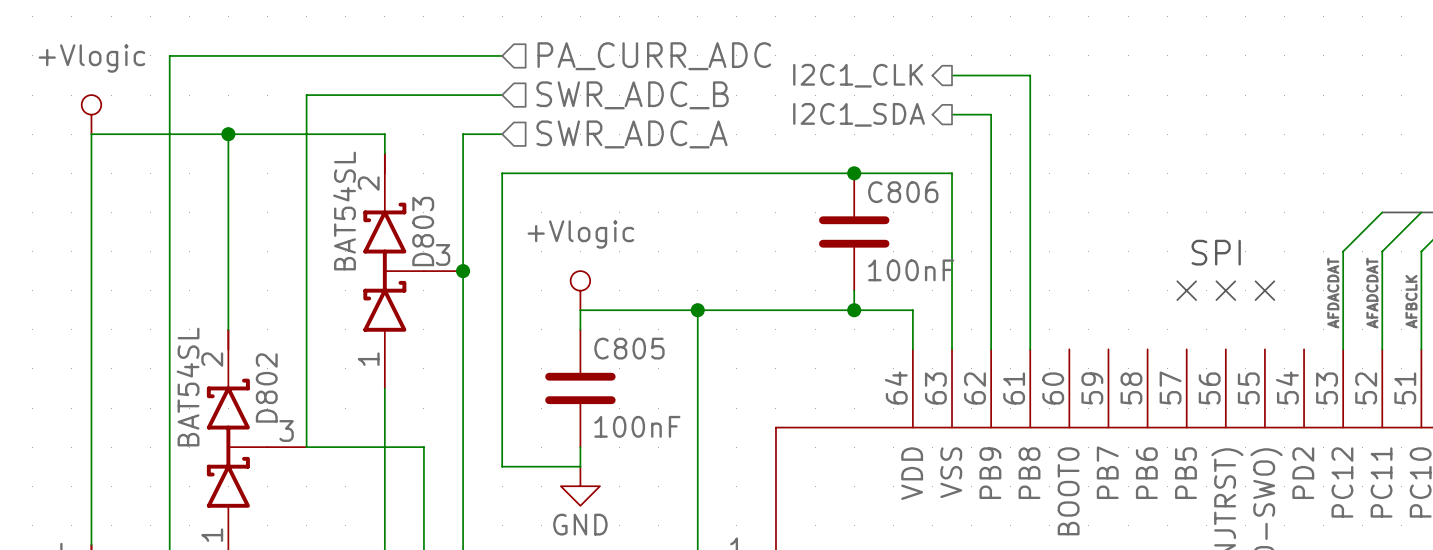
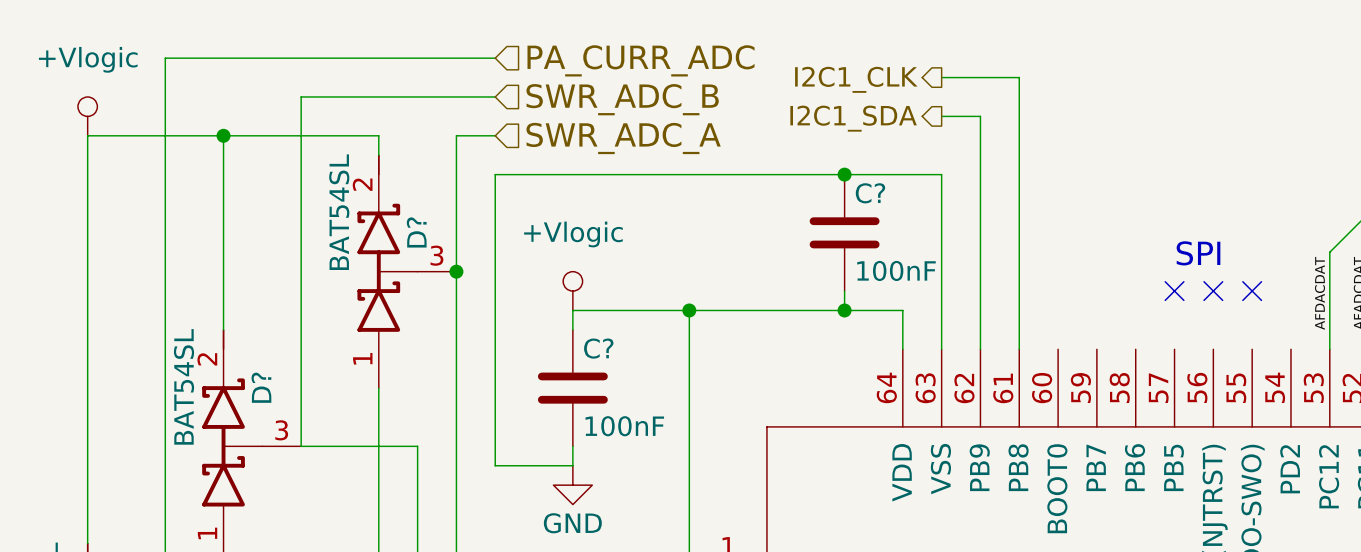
C806 name: C806 (903, 192) -> C? (870, 193)
D803 name: D803 (423, 231) -> D? (416, 232)
C805 name: C805 (629, 348) -> C? (598, 348)
D802 name: D802 (266, 387) -> D? (261, 387)

